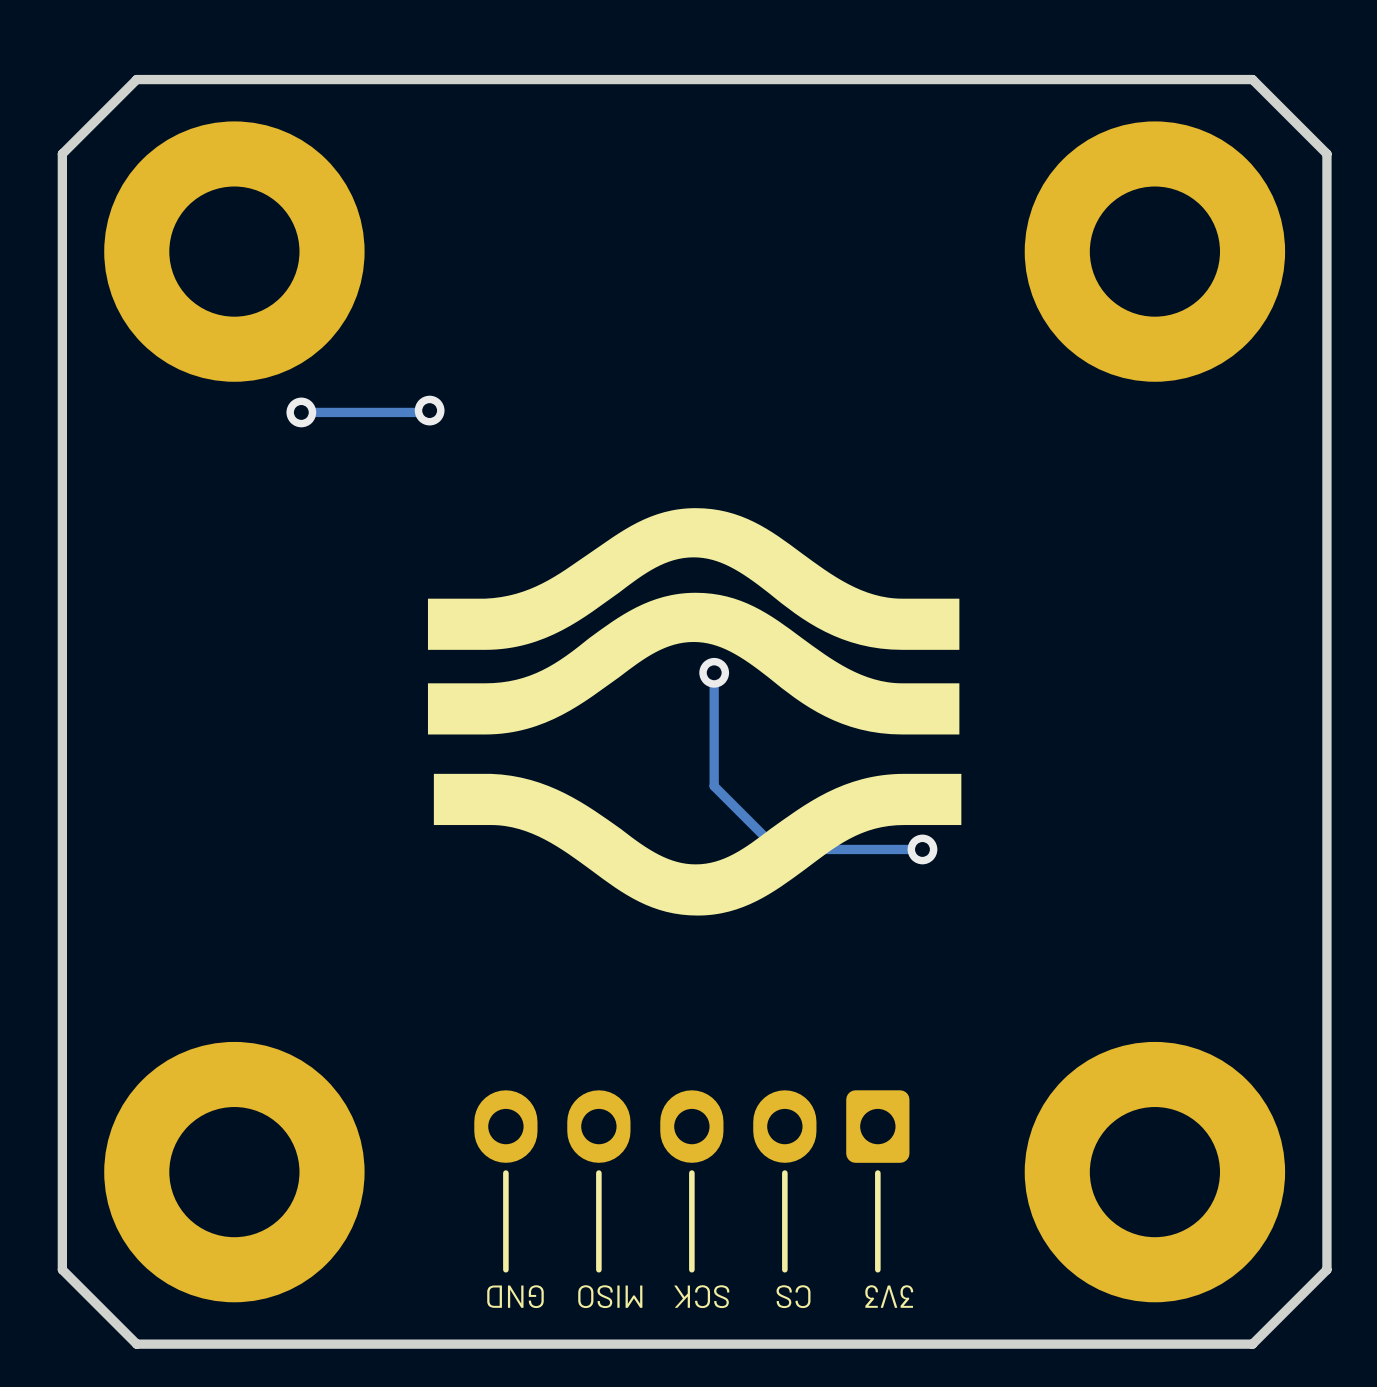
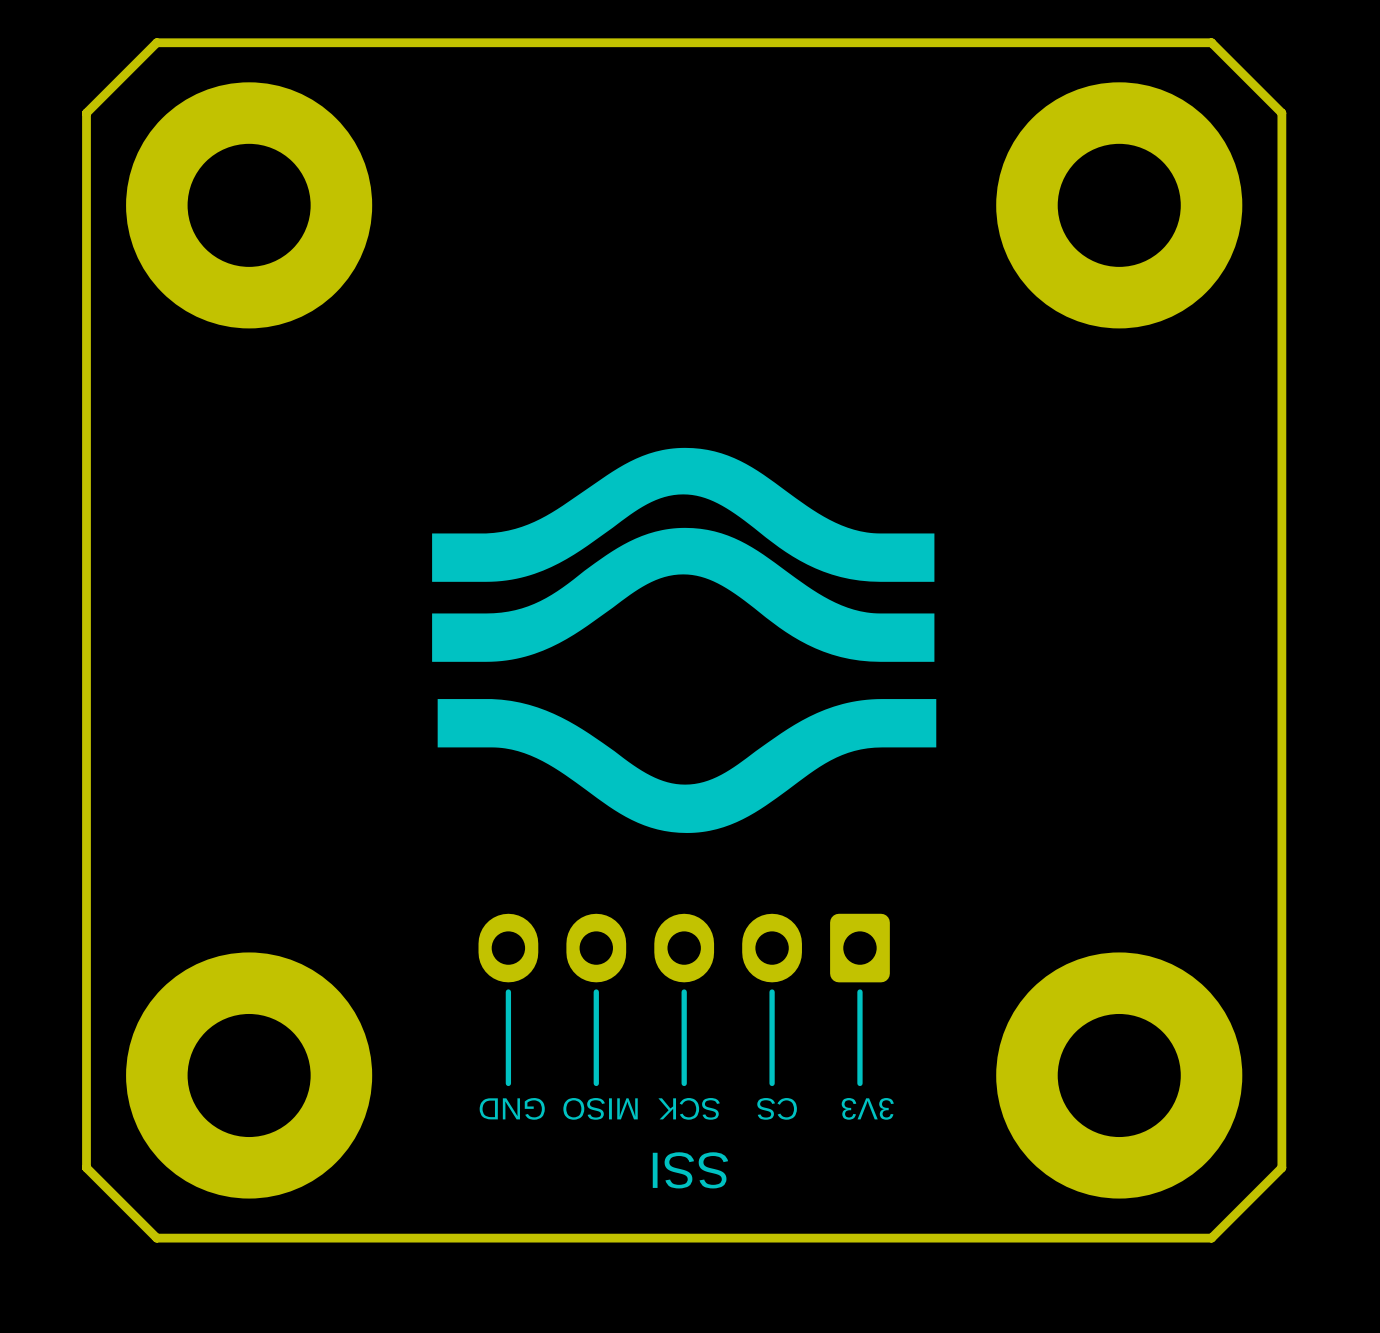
track: (429, 410) (427, 412) (301, 412) -> none
via: (429, 410) -> none
via: (301, 412) -> none
track: (714, 672) (714, 786) (777, 849) (922, 849) -> none
via: (714, 672) -> none
via: (922, 849) -> none
part position: (691, 1126) -> (684, 948)
line: (505, 1173) (505, 1269) -> (508, 992) (508, 1083)
line: (598, 1173) (598, 1269) -> (596, 992) (596, 1083)
line: (691, 1173) (691, 1269) -> (684, 992) (684, 1083)
line: (784, 1173) (784, 1269) -> (772, 992) (772, 1083)
line: (877, 1173) (877, 1269) -> (859, 992) (859, 1083)
text: none -> SSI (690, 1170)
text position: GND (515, 1296) -> GND (512, 1108)
text position: MISO (610, 1296) -> MISO (600, 1108)
text position: SCK (701, 1296) -> SCK (689, 1108)
text position: CS (793, 1296) -> CS (777, 1108)
text position: 3V3 (889, 1296) -> 3V3 (867, 1108)

